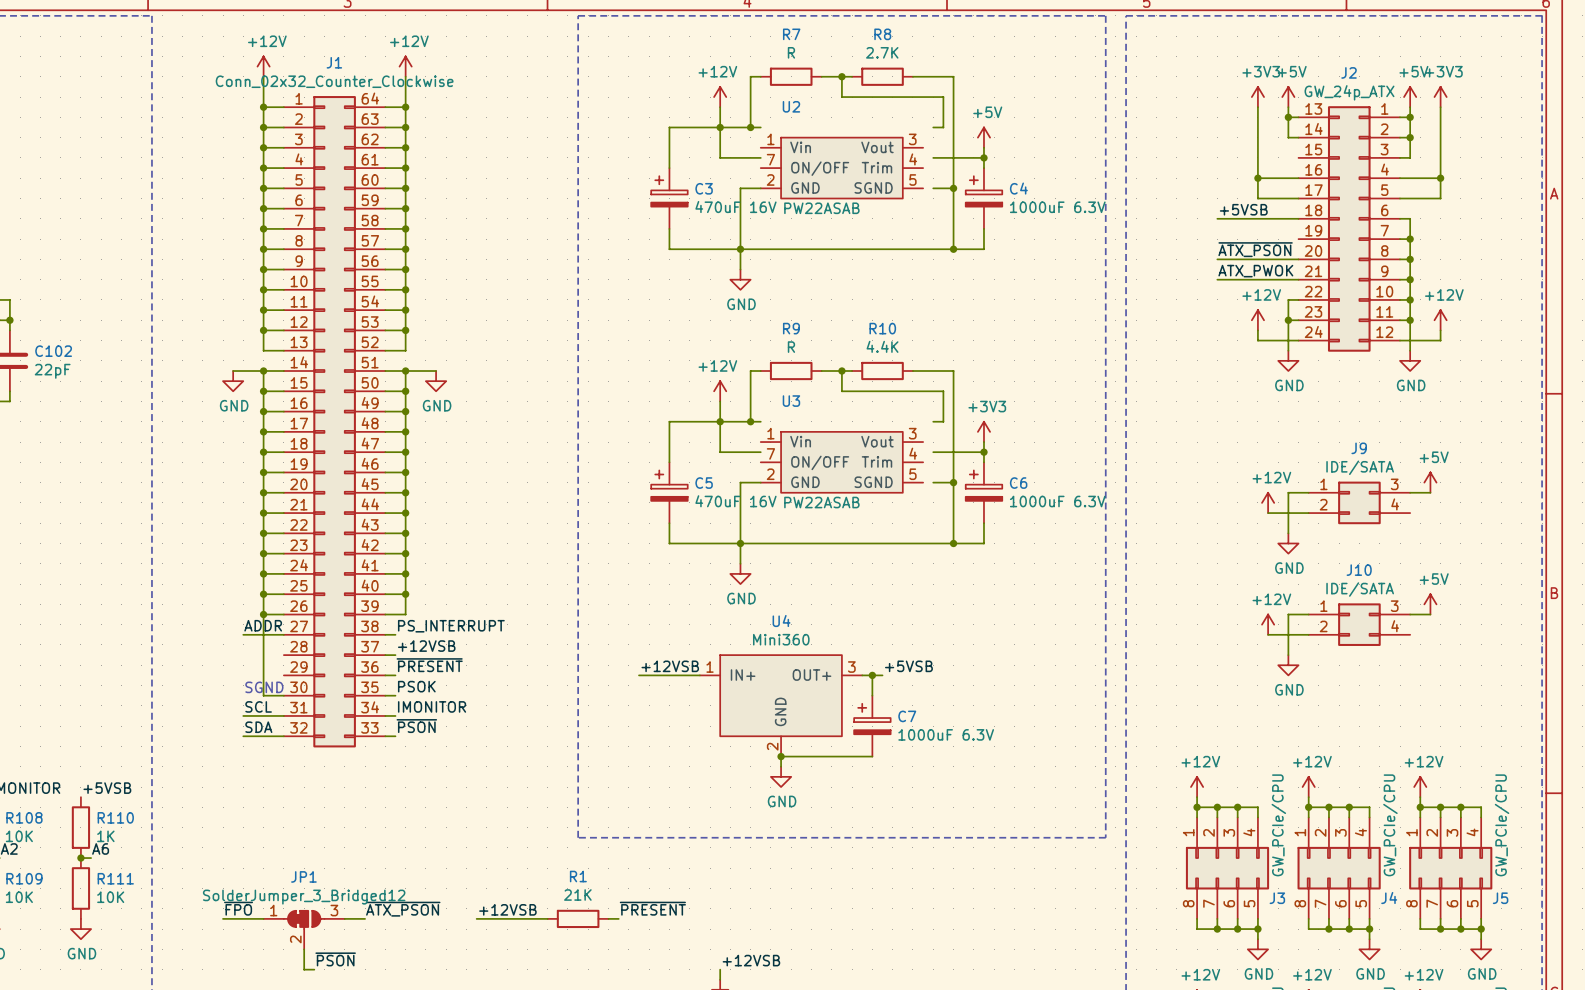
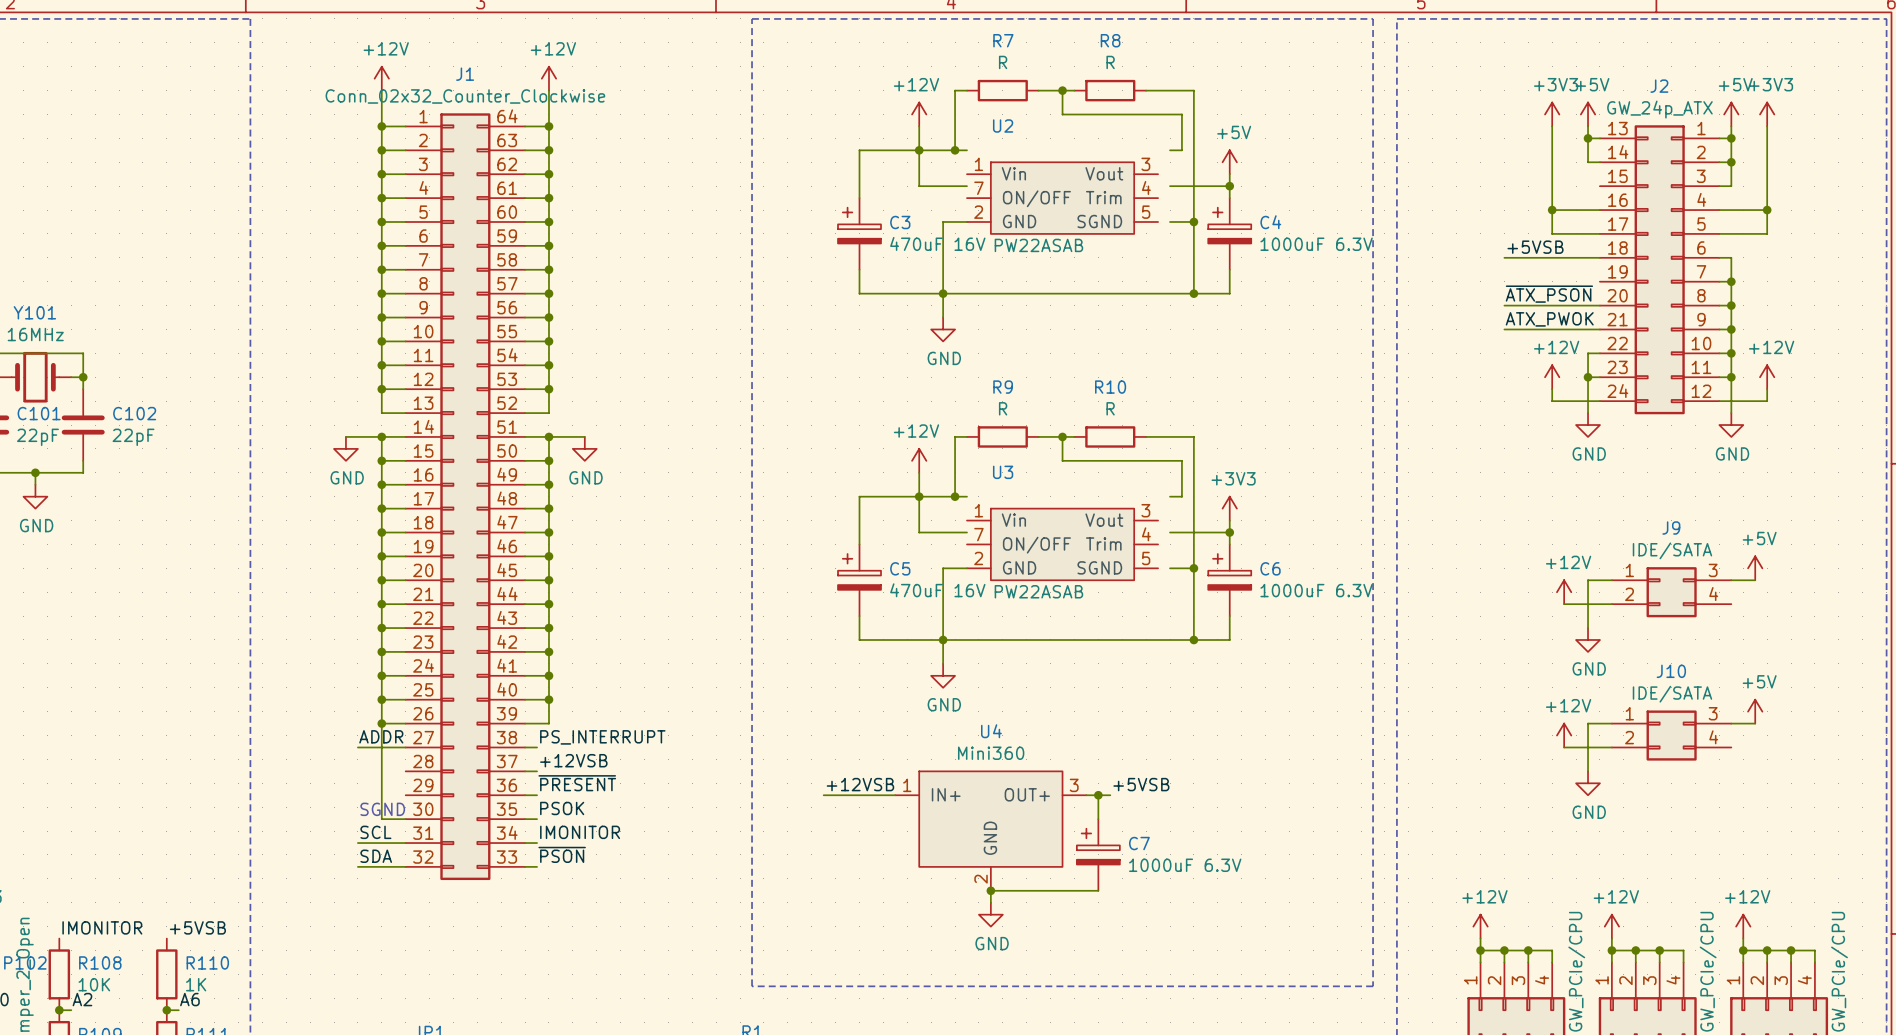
R8 value: 2.7K (882, 52) -> R (1110, 62)
R10 value: 4.4K (882, 346) -> R (1110, 408)

